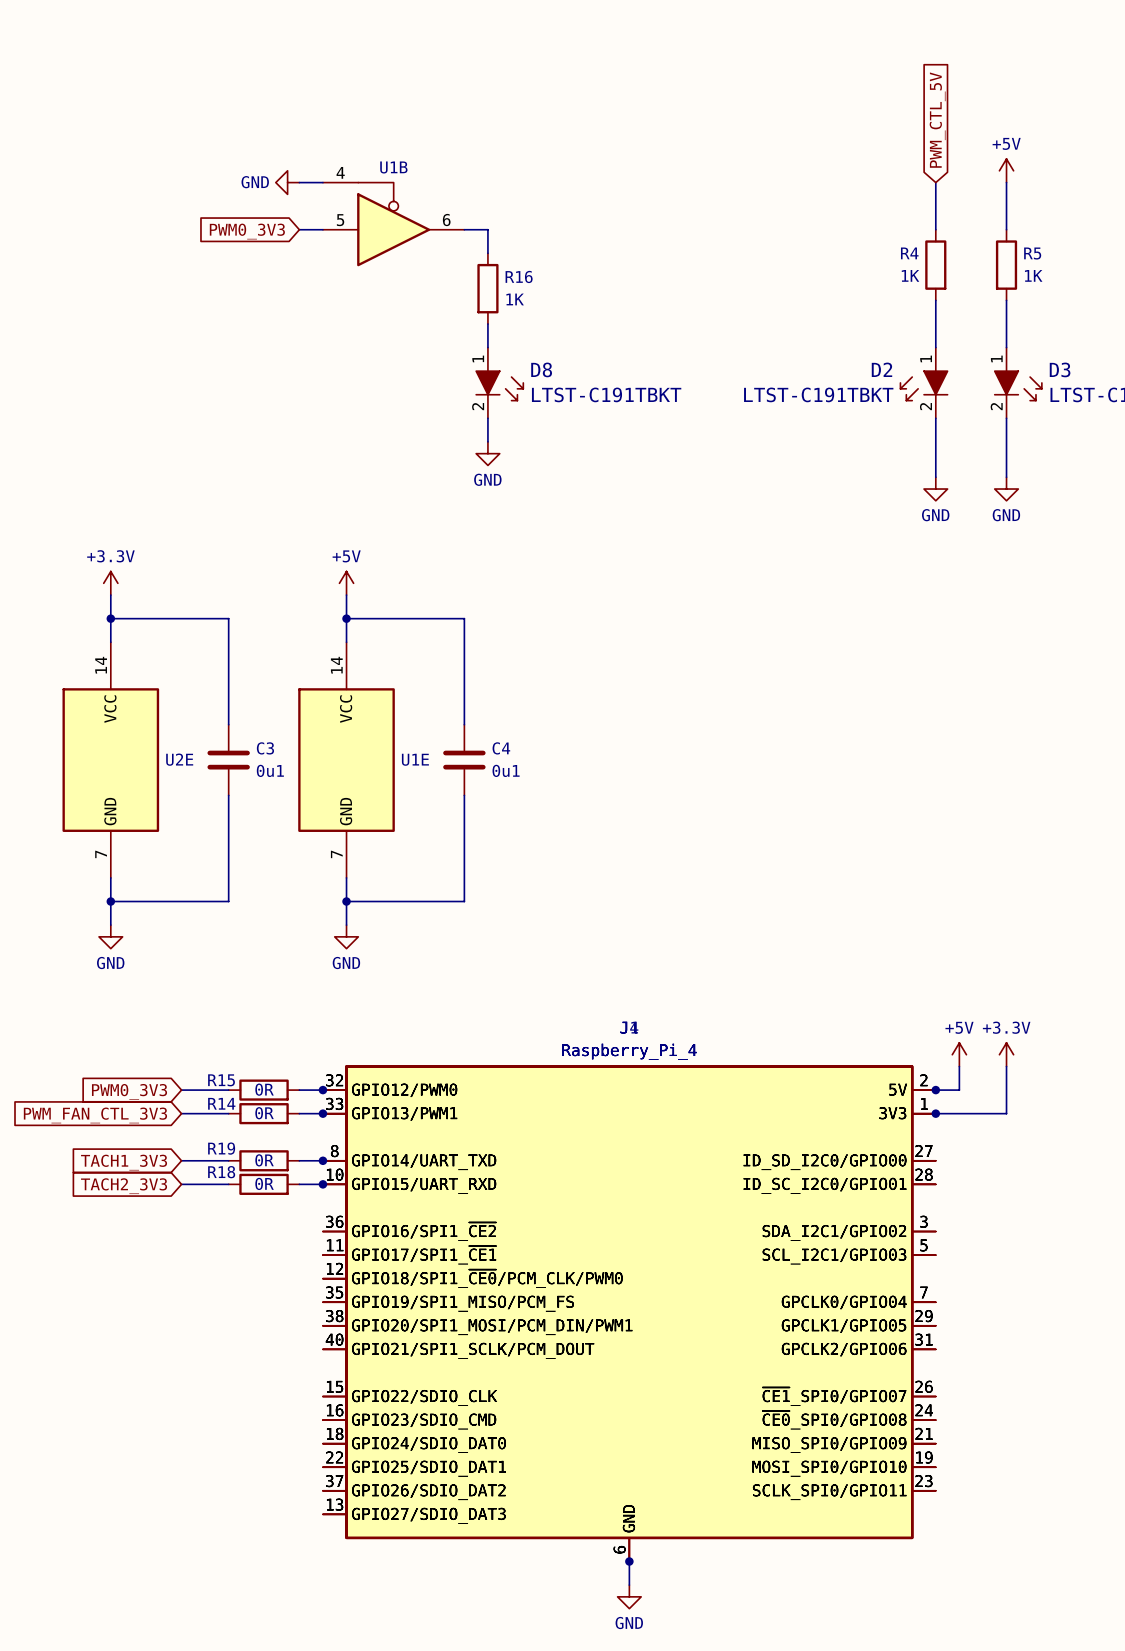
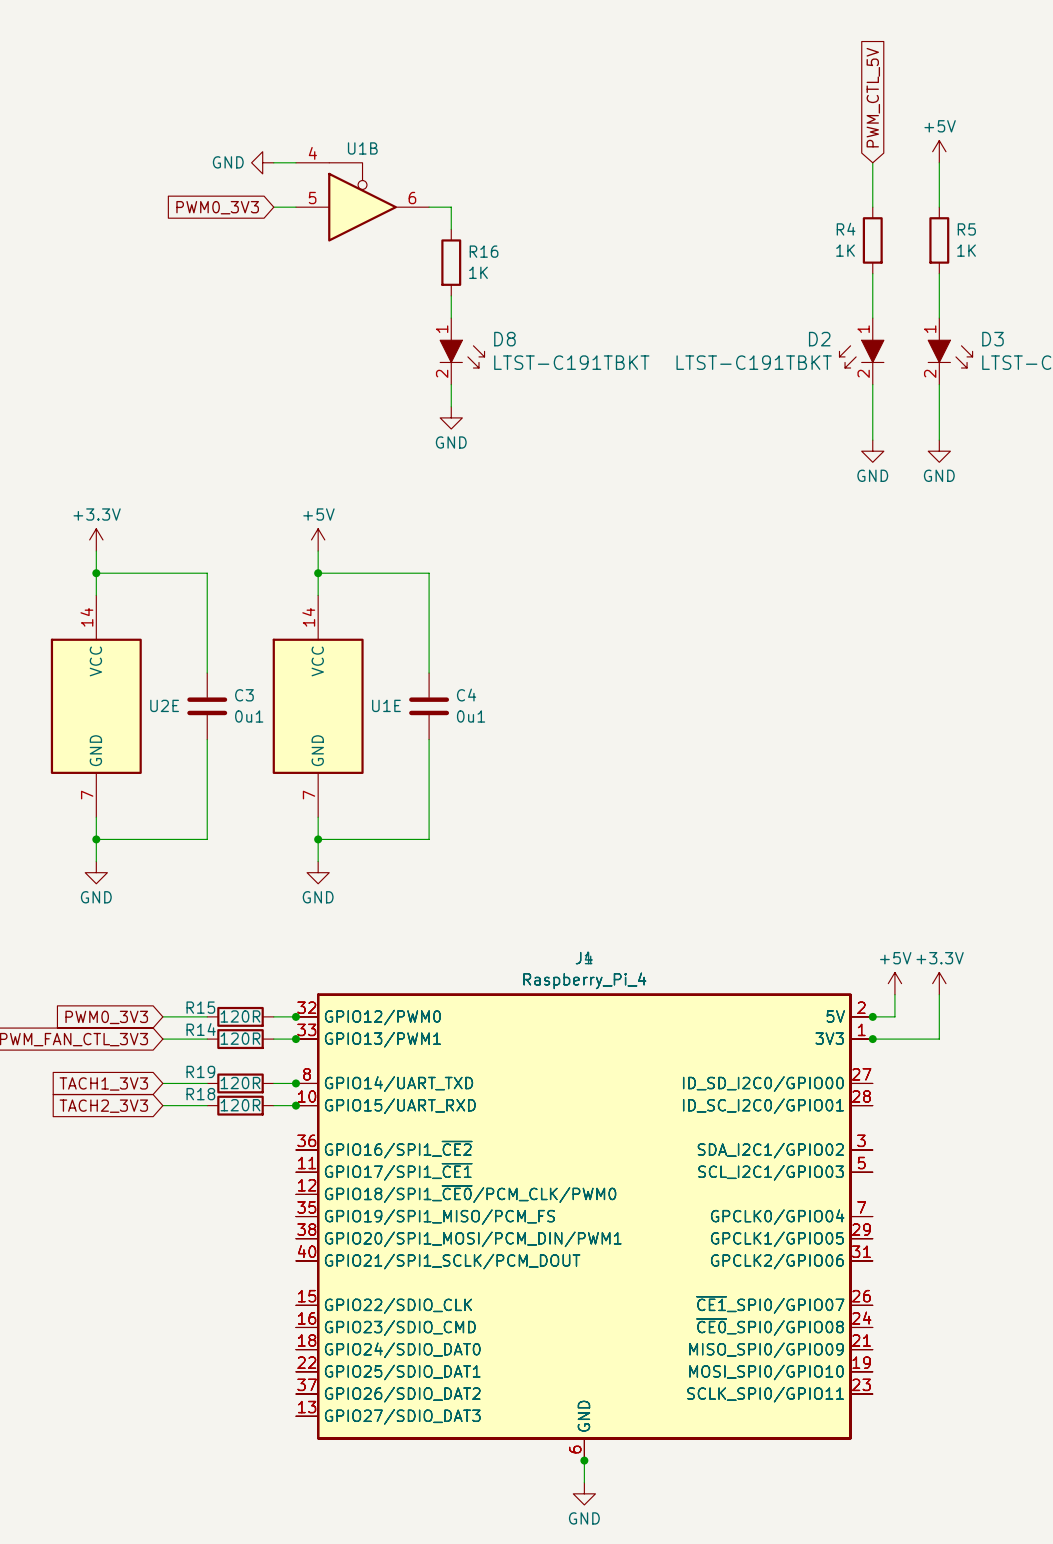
R15 value: 0R (264, 1089) -> 120R (240, 1016)
R14 value: 0R (264, 1113) -> 120R (240, 1038)
R19 value: 0R (264, 1160) -> 120R (240, 1083)
R18 value: 0R (264, 1183) -> 120R (240, 1105)

